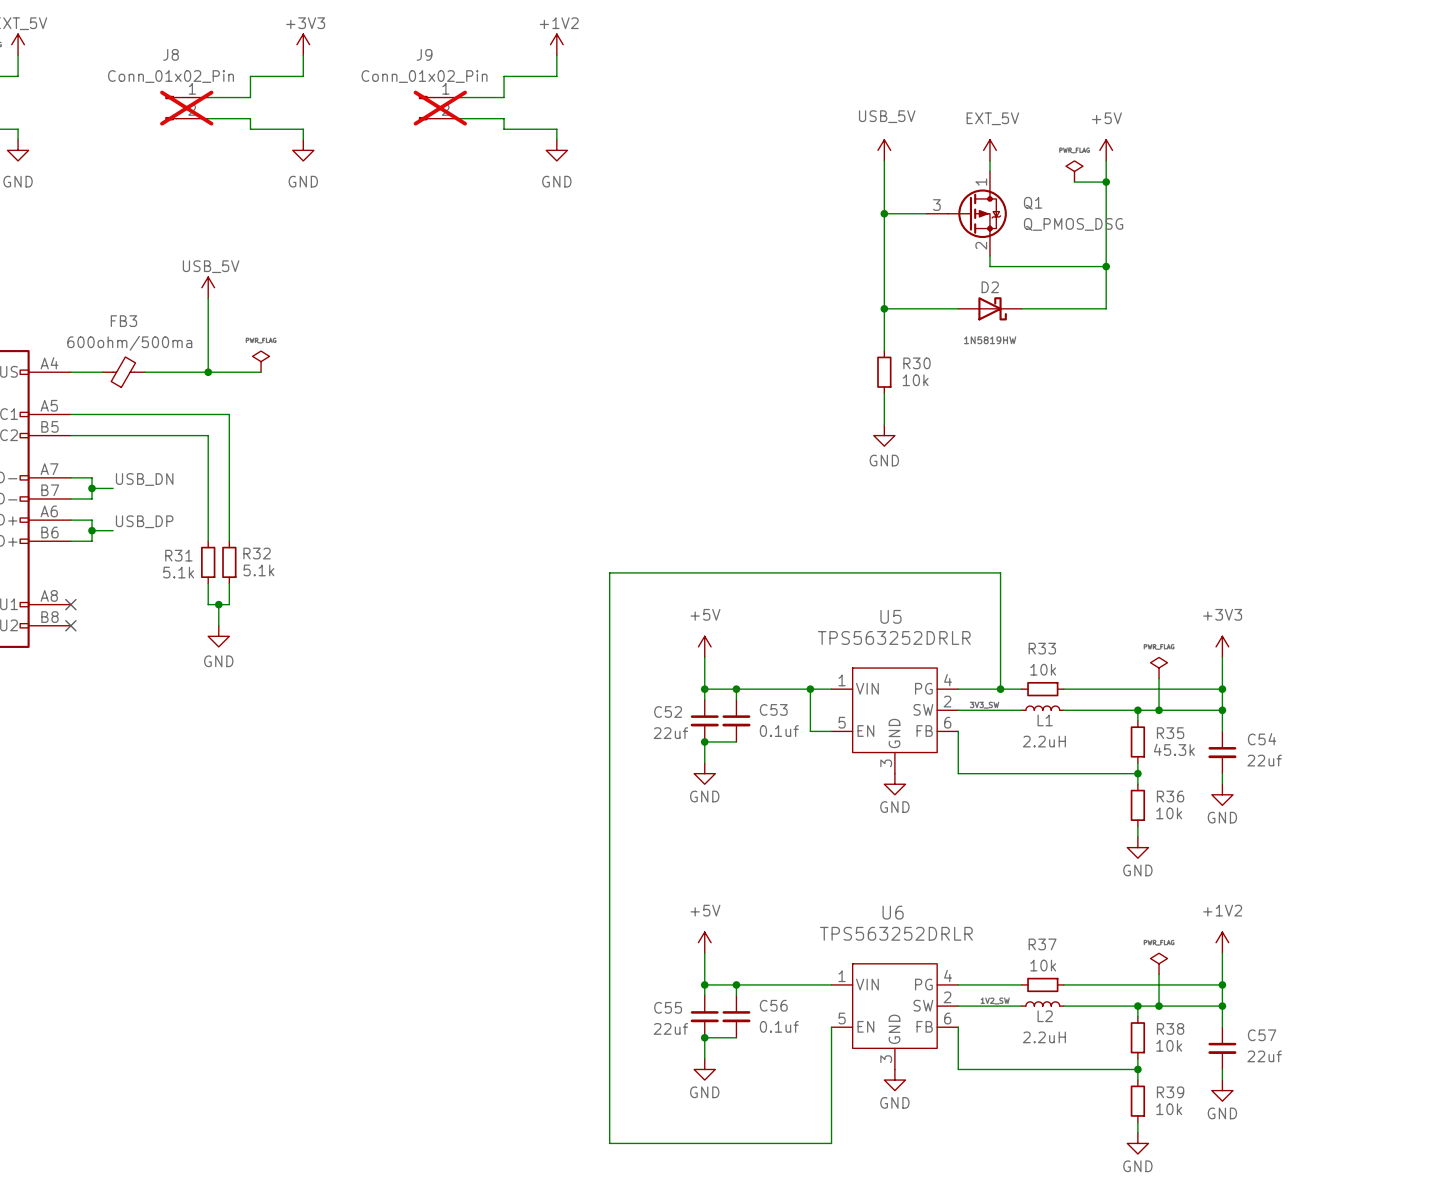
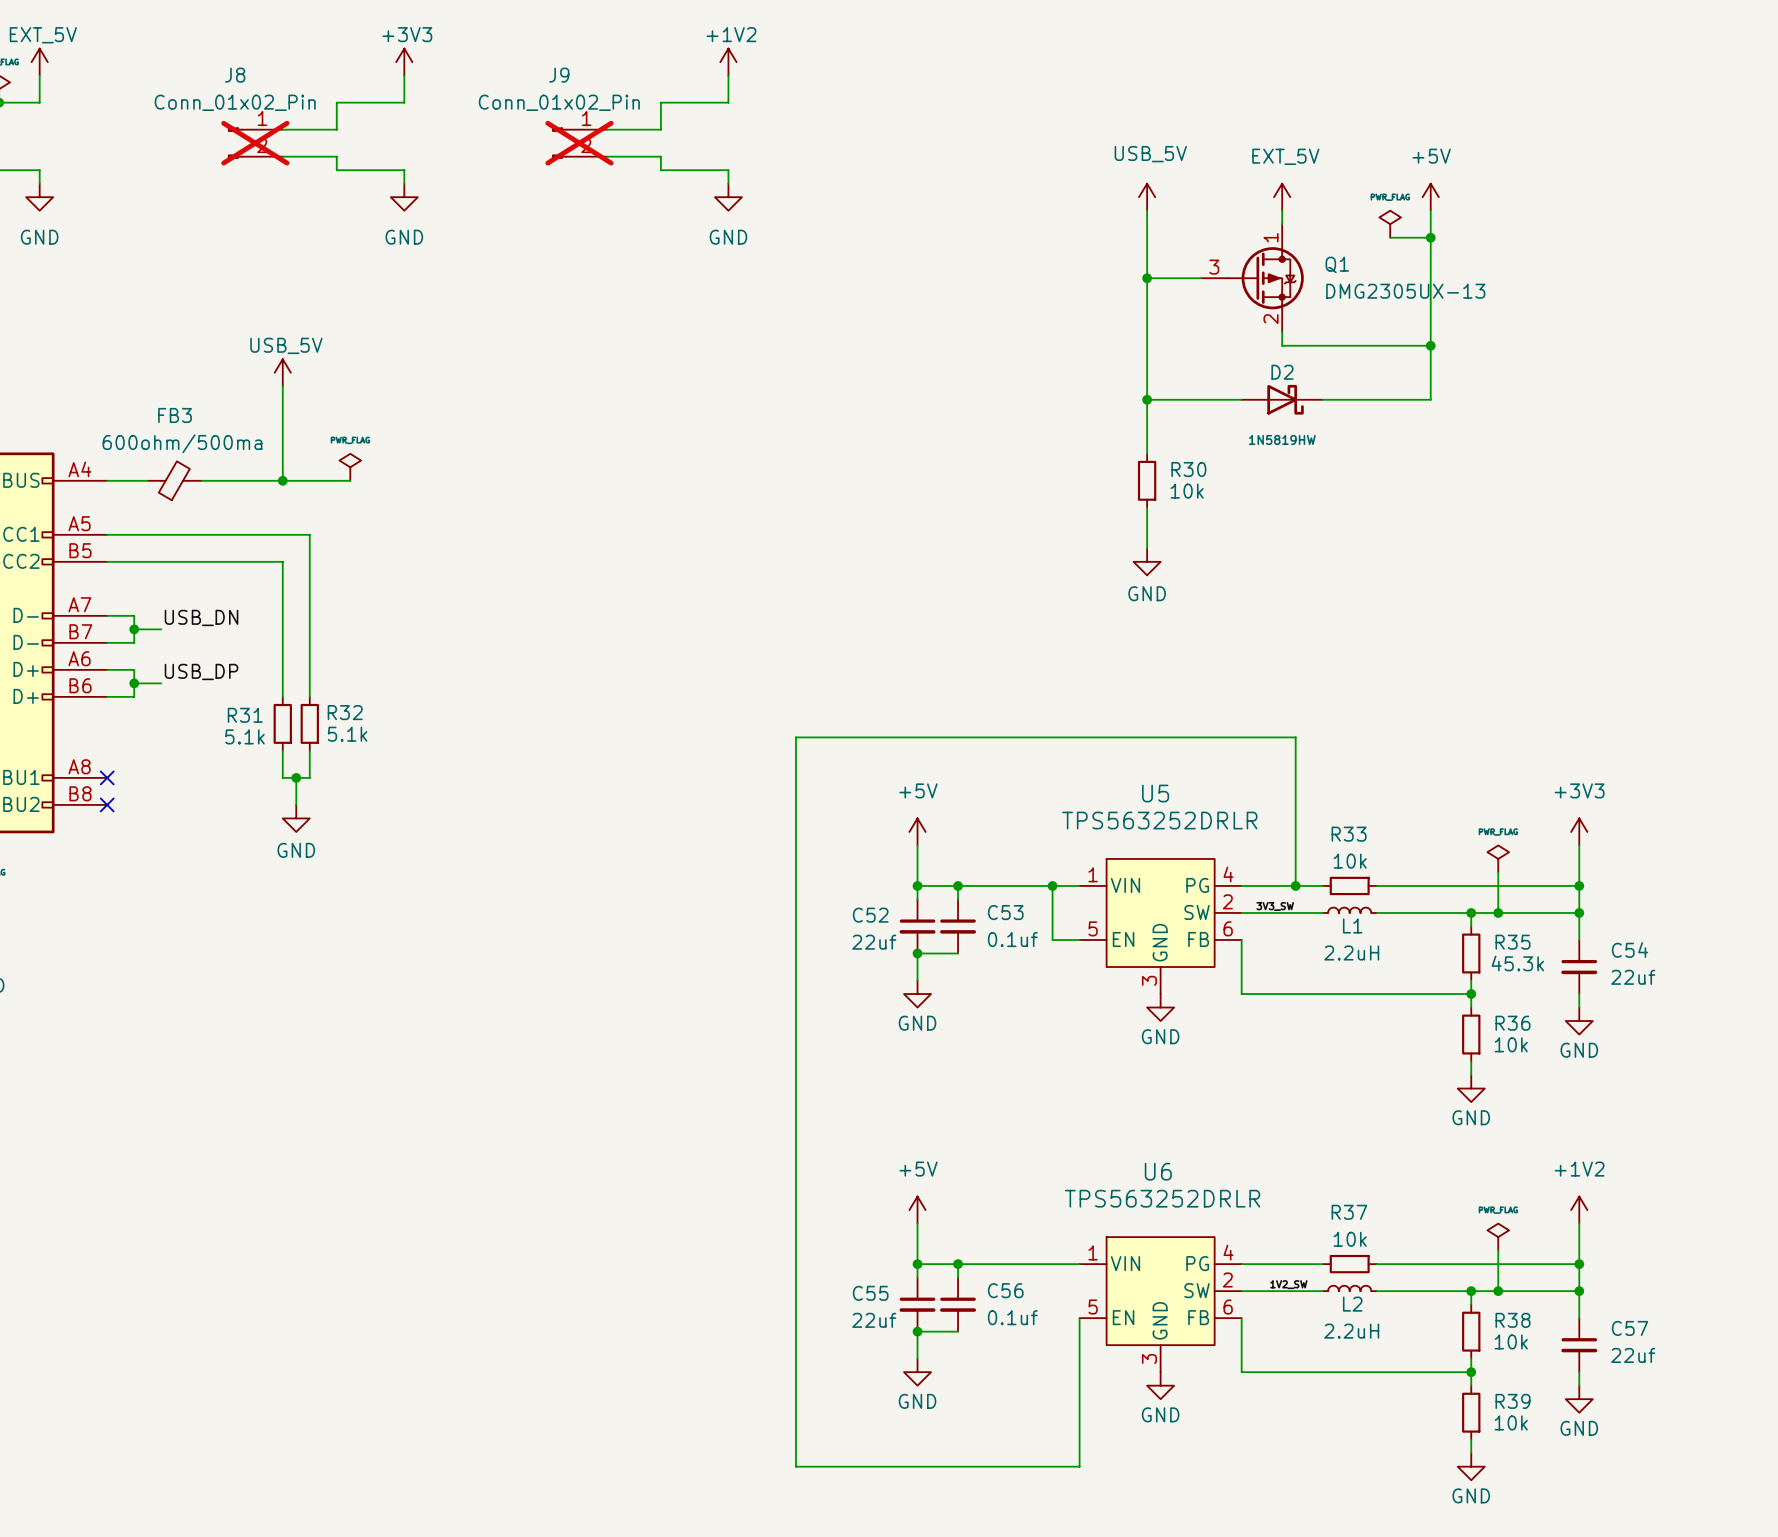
Q1 value: Q_PMOS_DSG (1073, 224) -> DMG2305UX-13 (1405, 291)

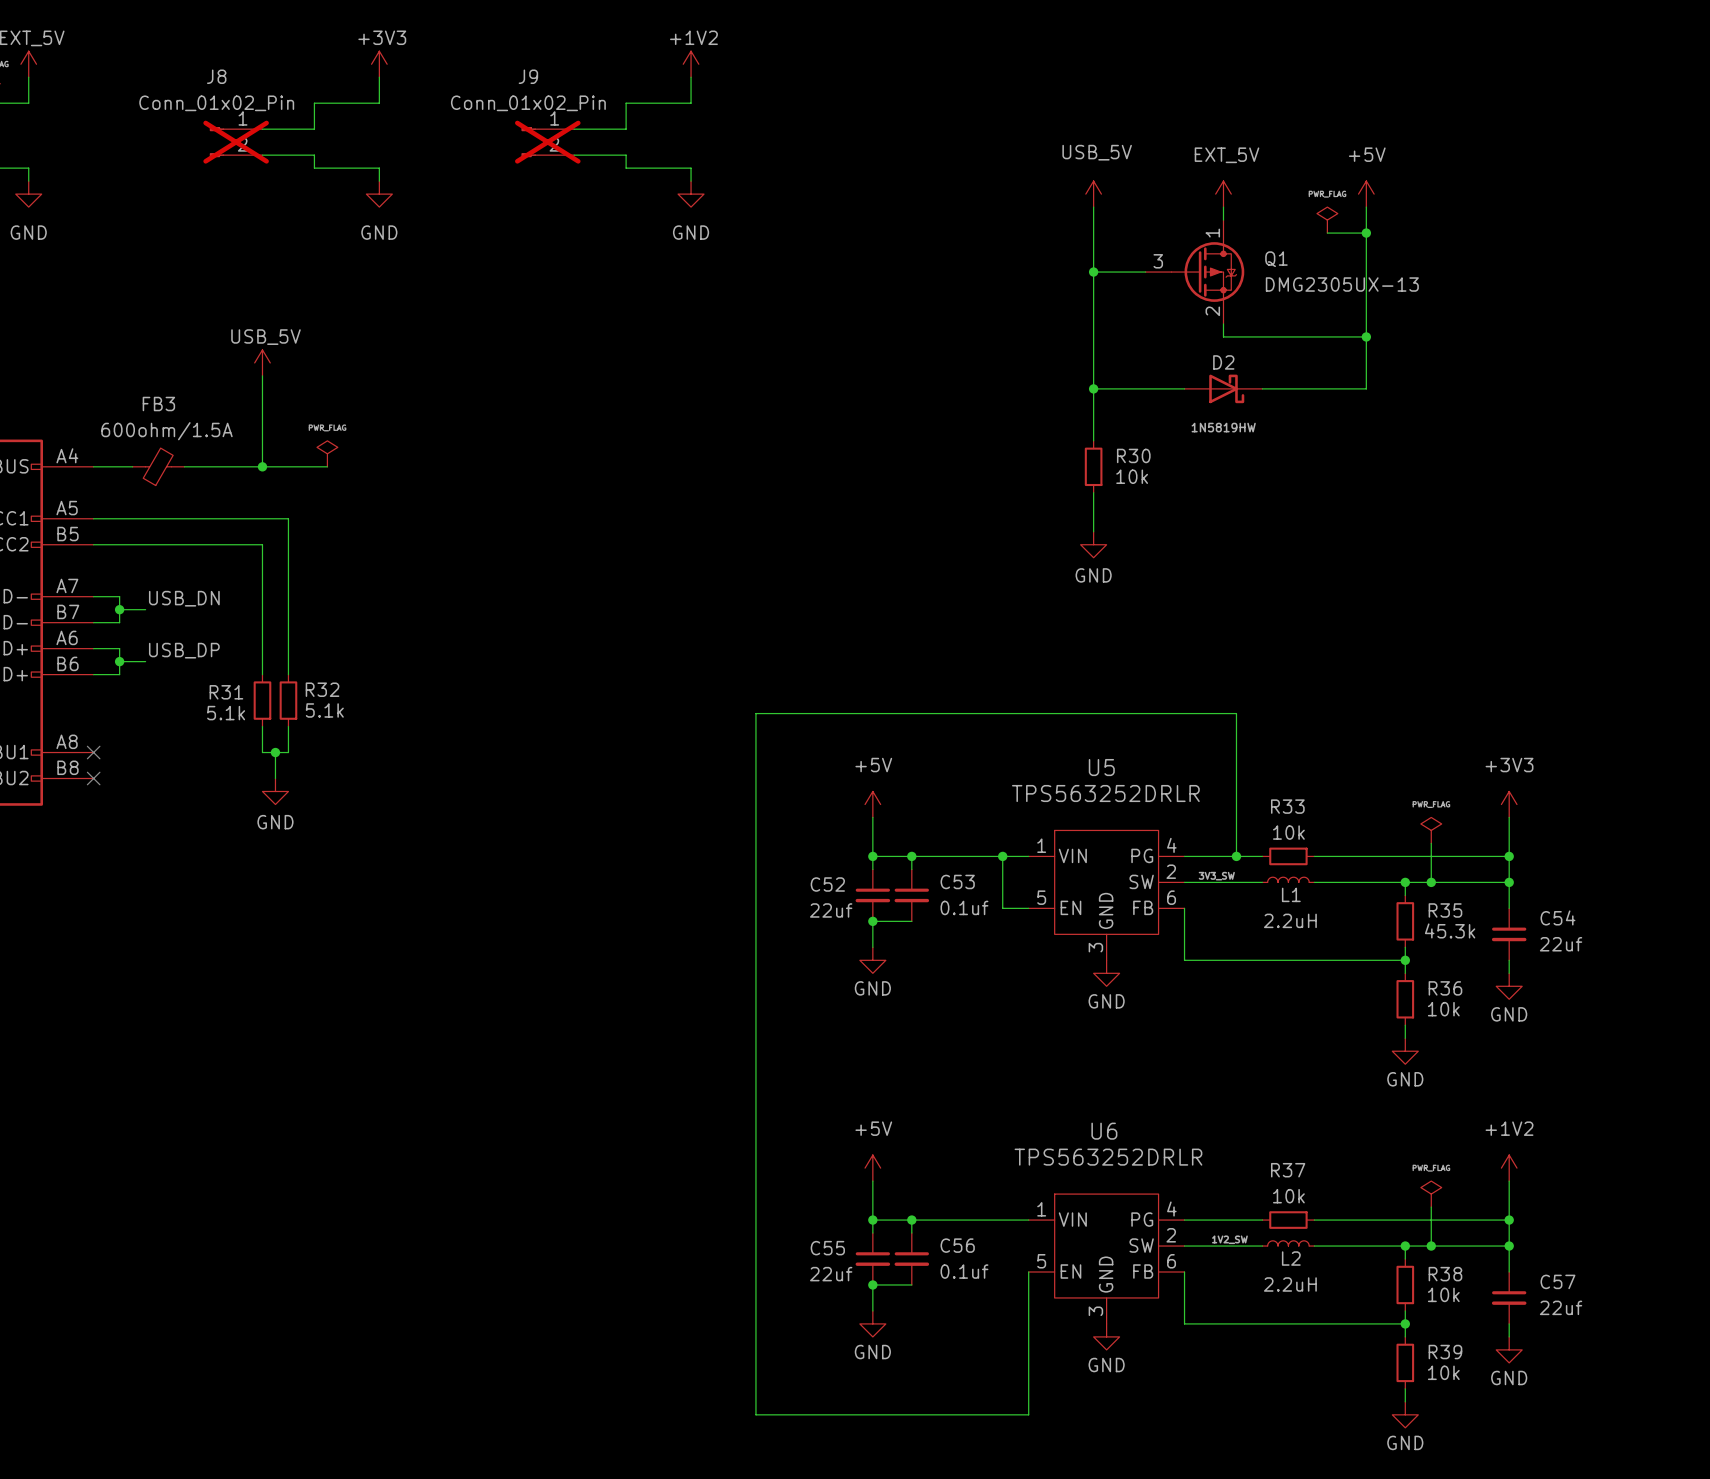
FB3 value: 600ohm/500ma (182, 443) -> 600ohm/1.5A (166, 431)

